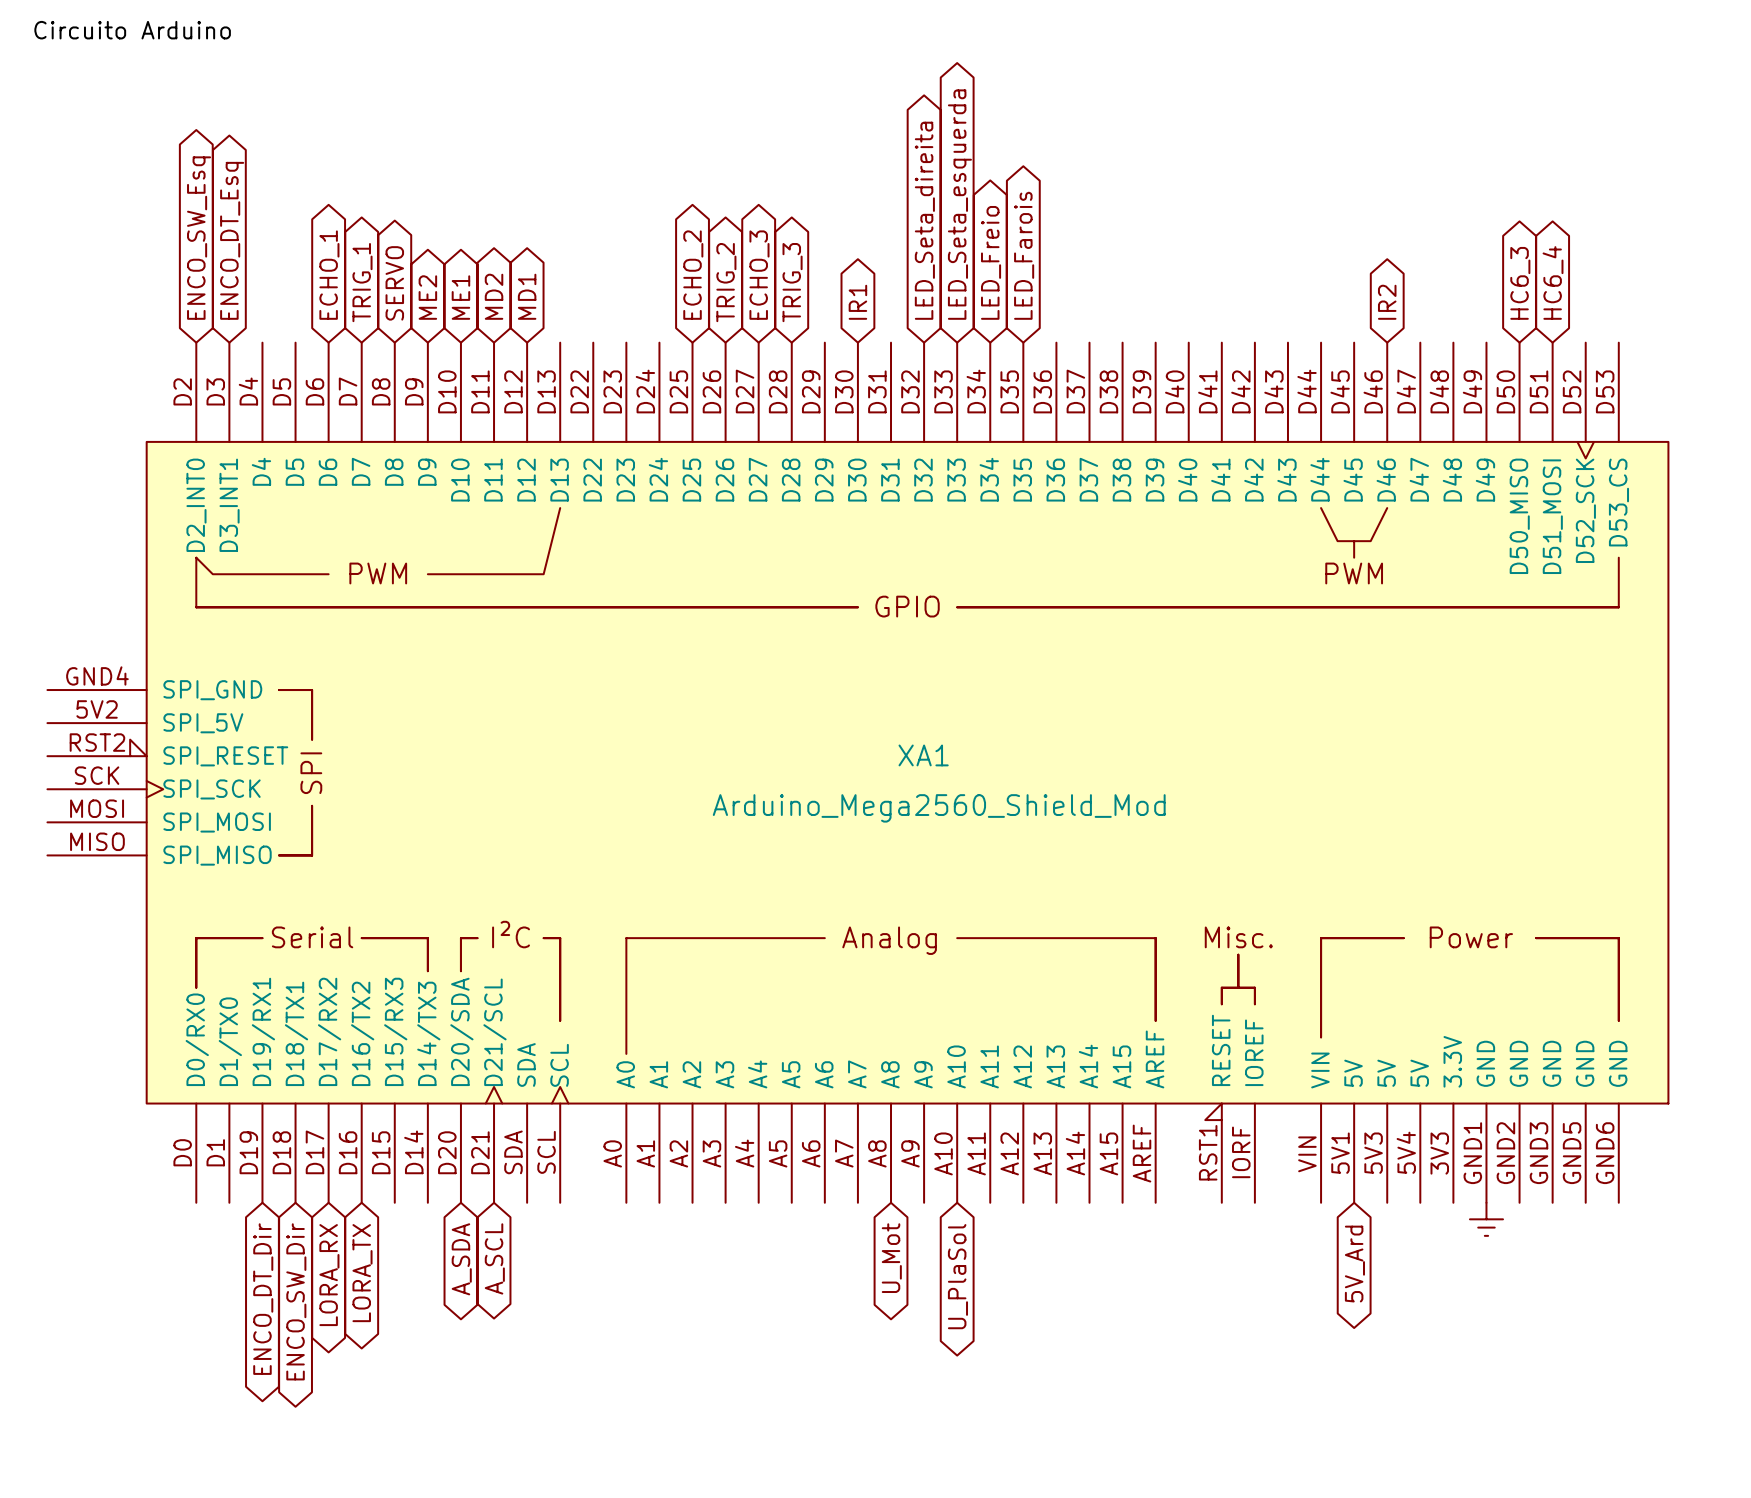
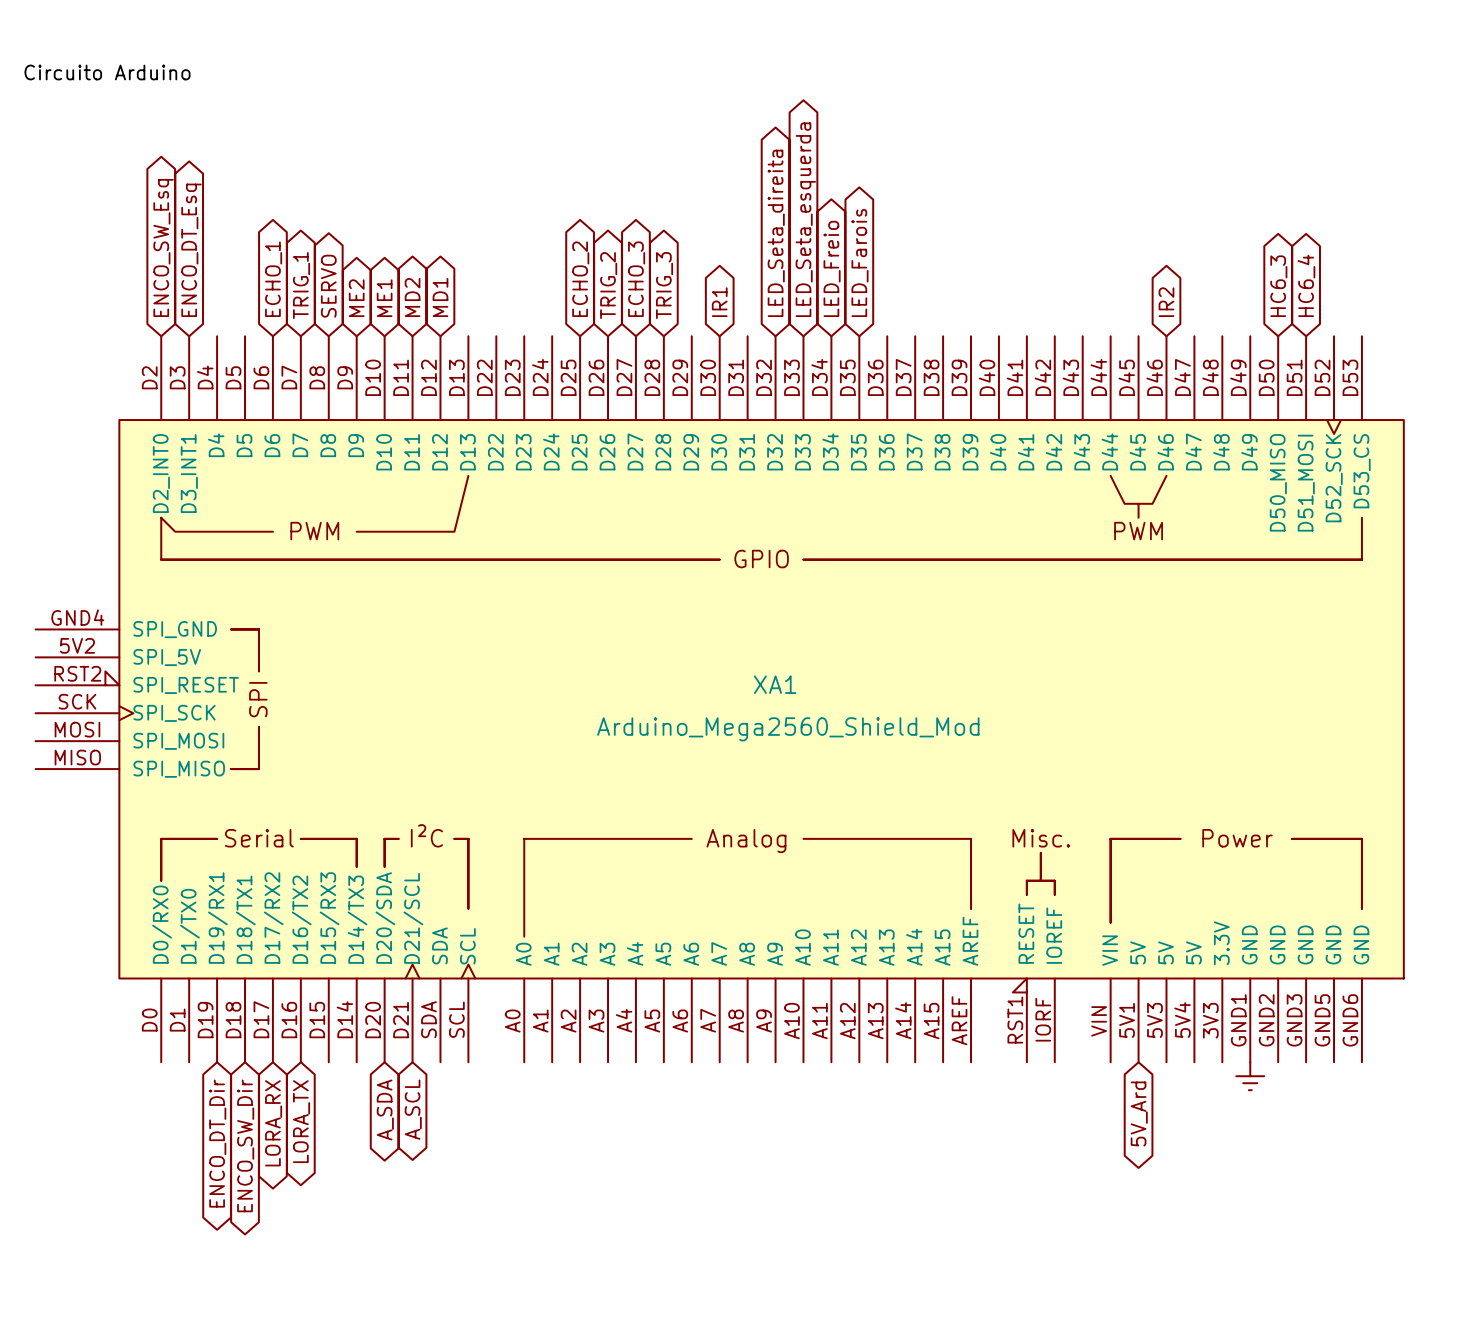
global label: U_Mot (891, 1258) -> none
global label: U_PlaSol (957, 1276) -> none

